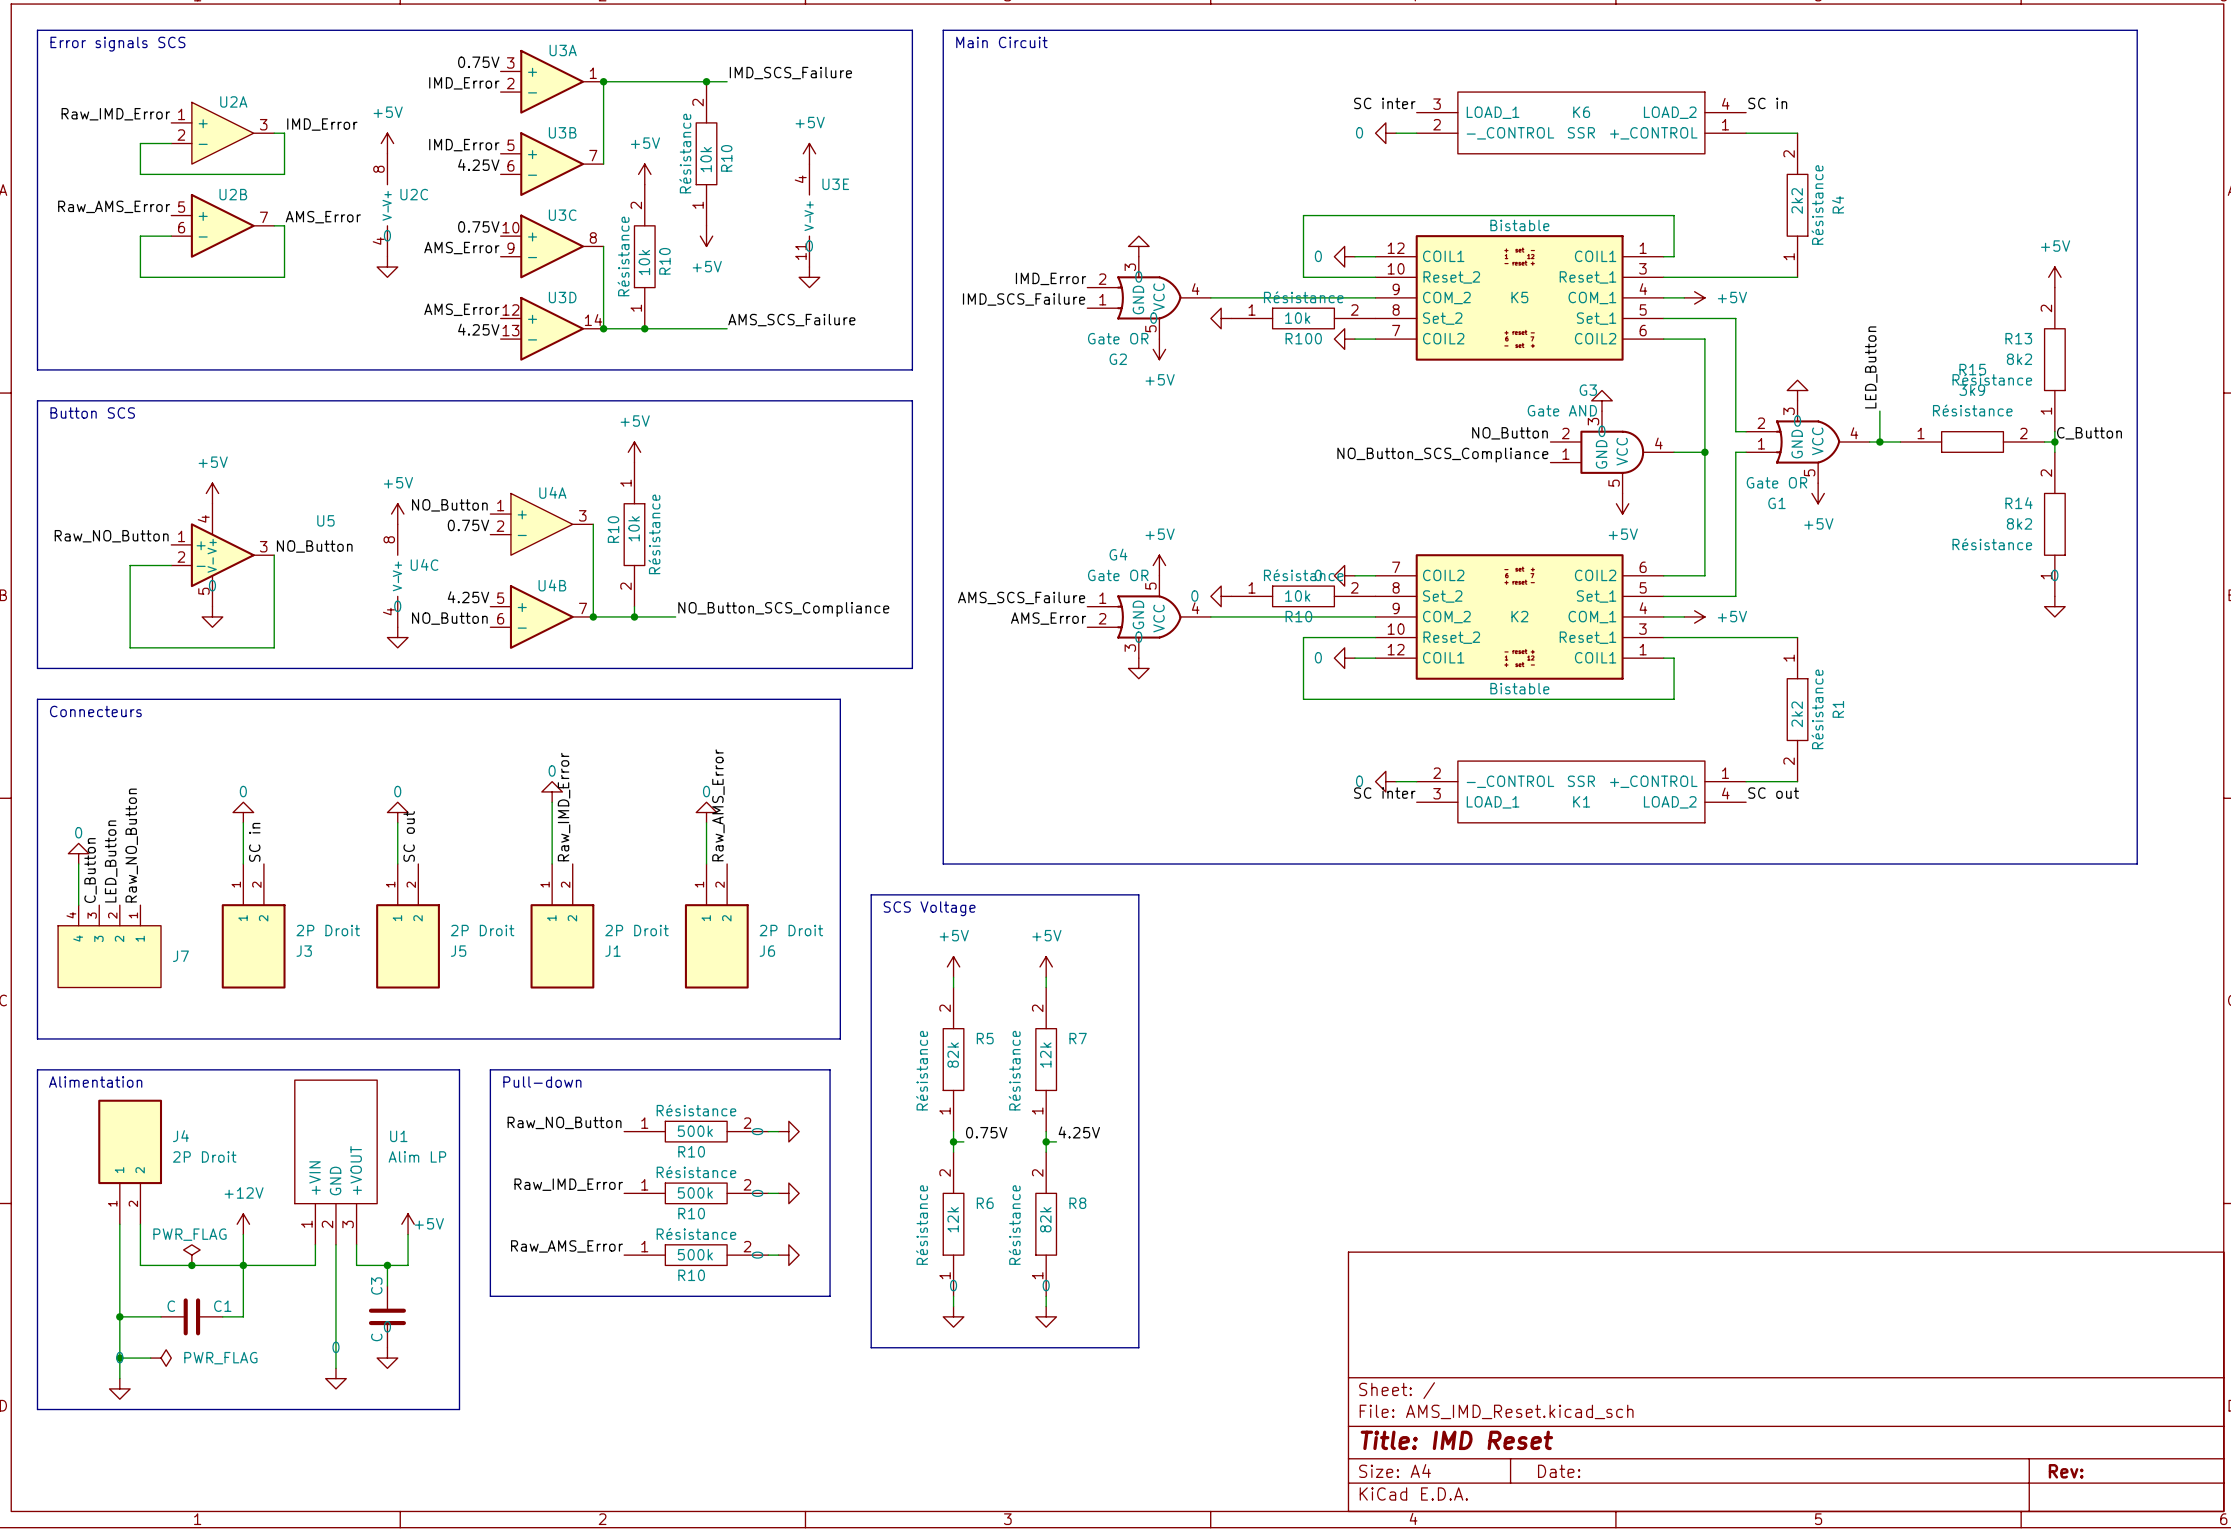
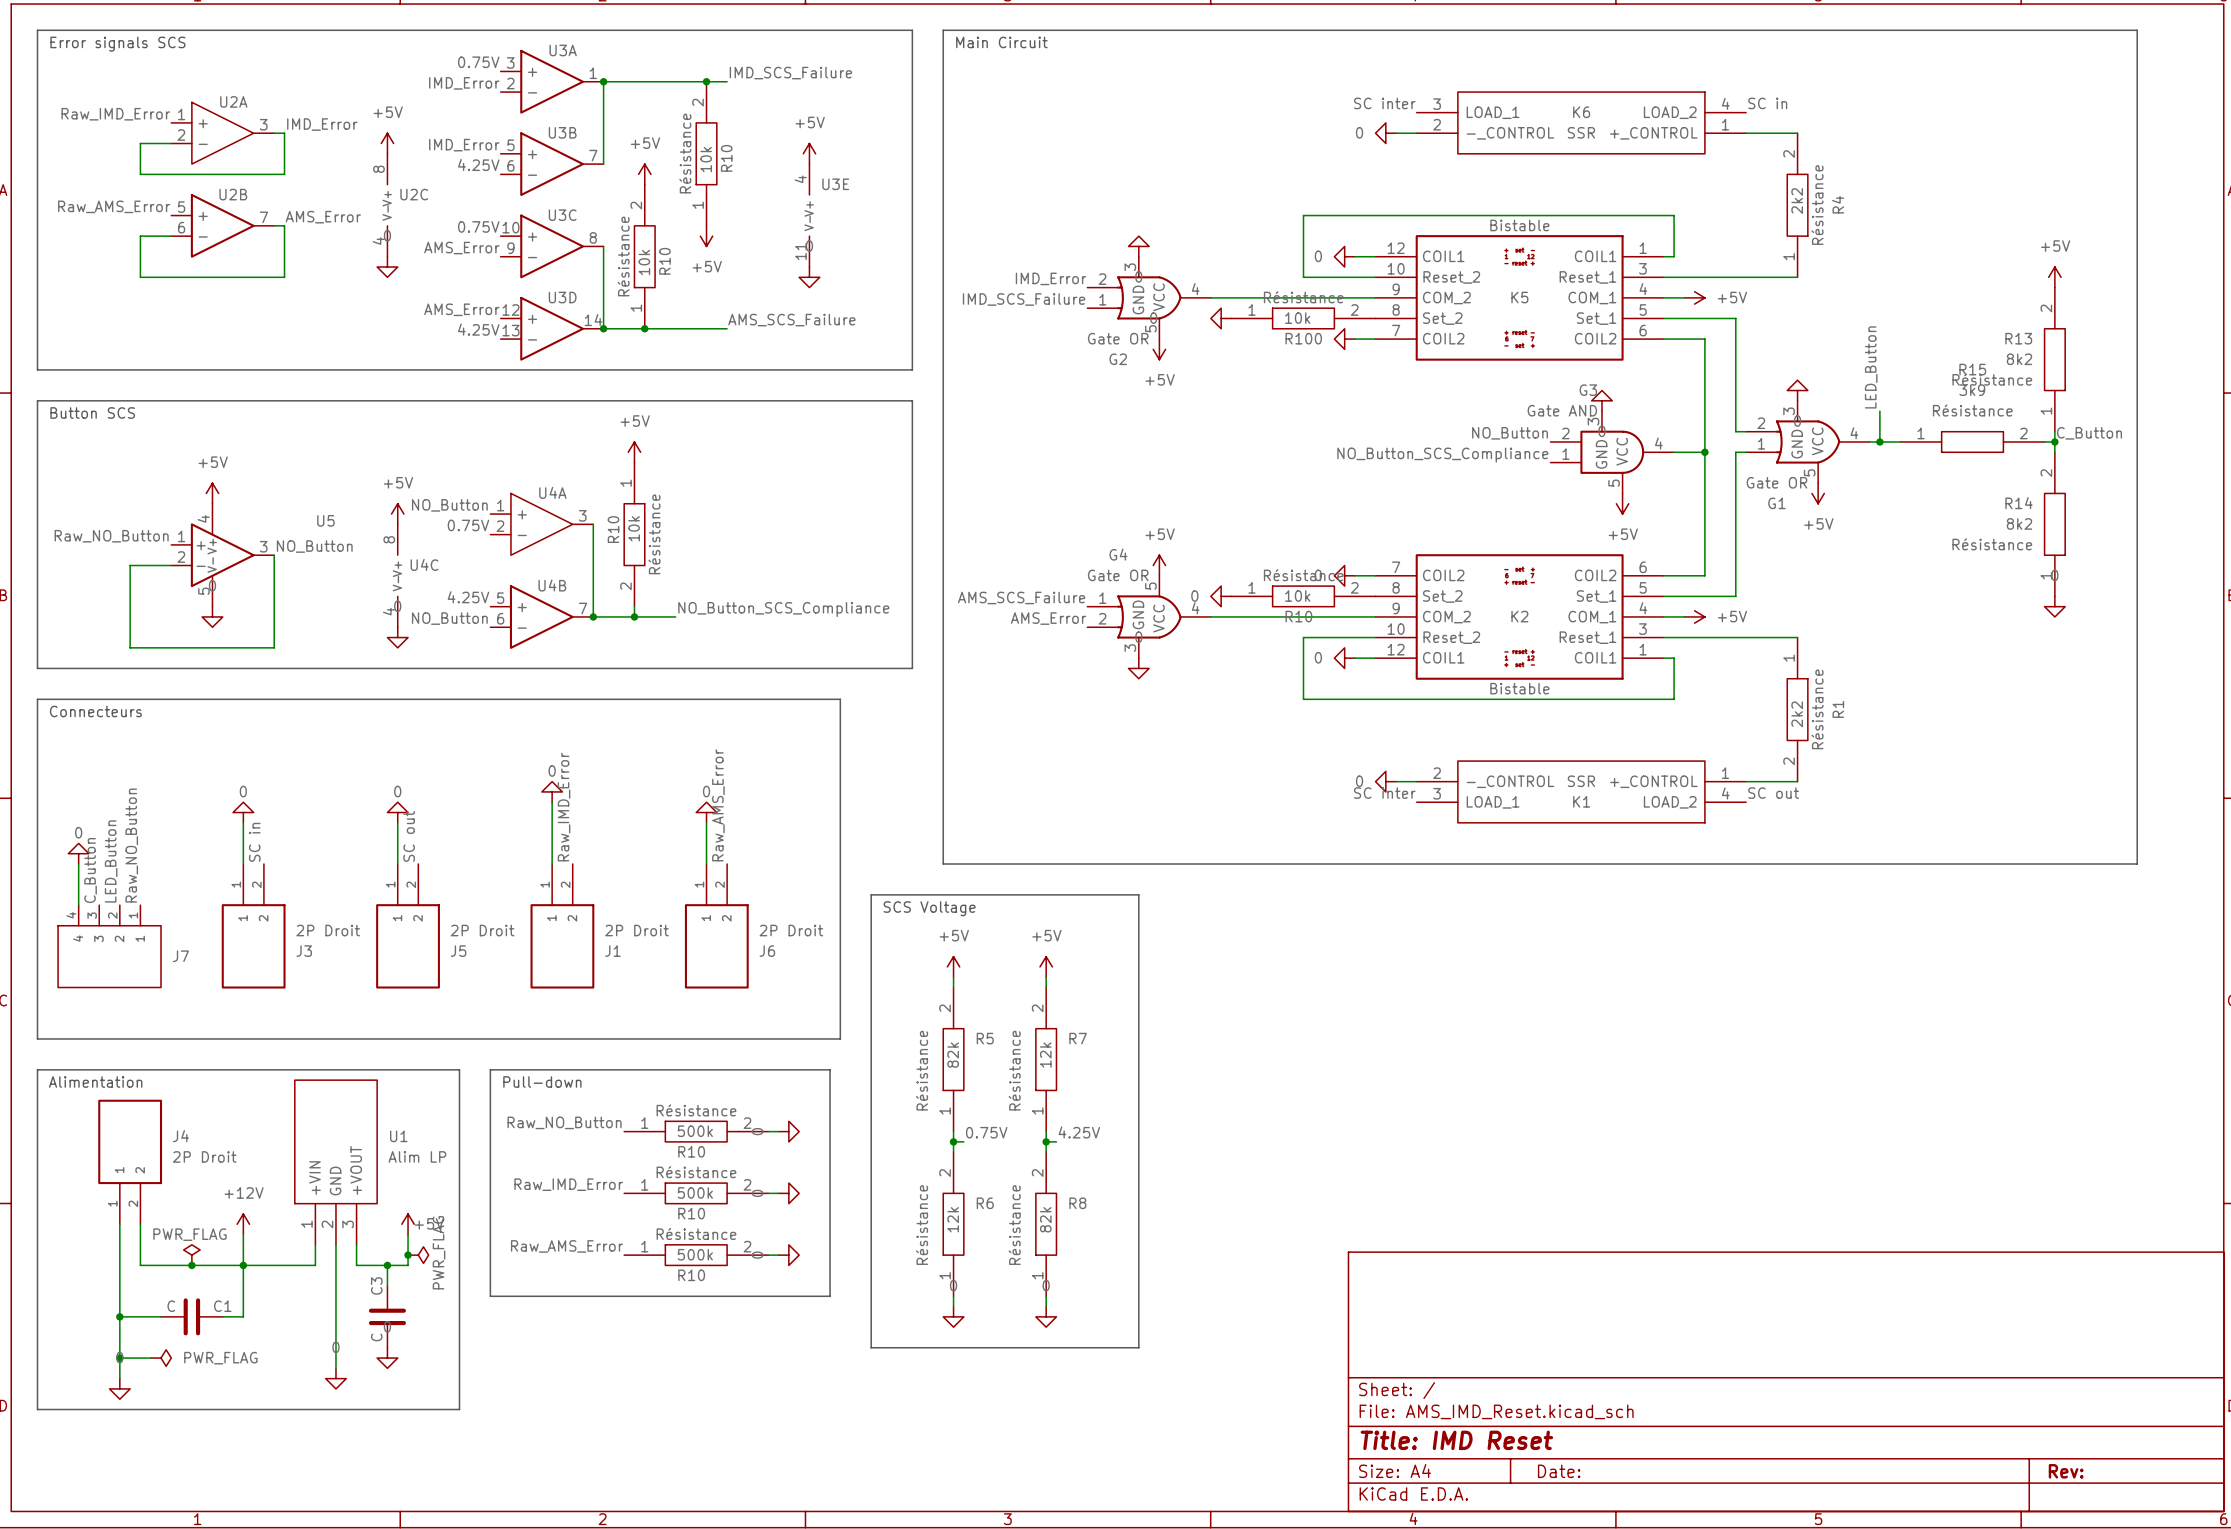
junction: none -> (408, 1255)
power symbol: none -> PWR_FLAG (418, 1255)

